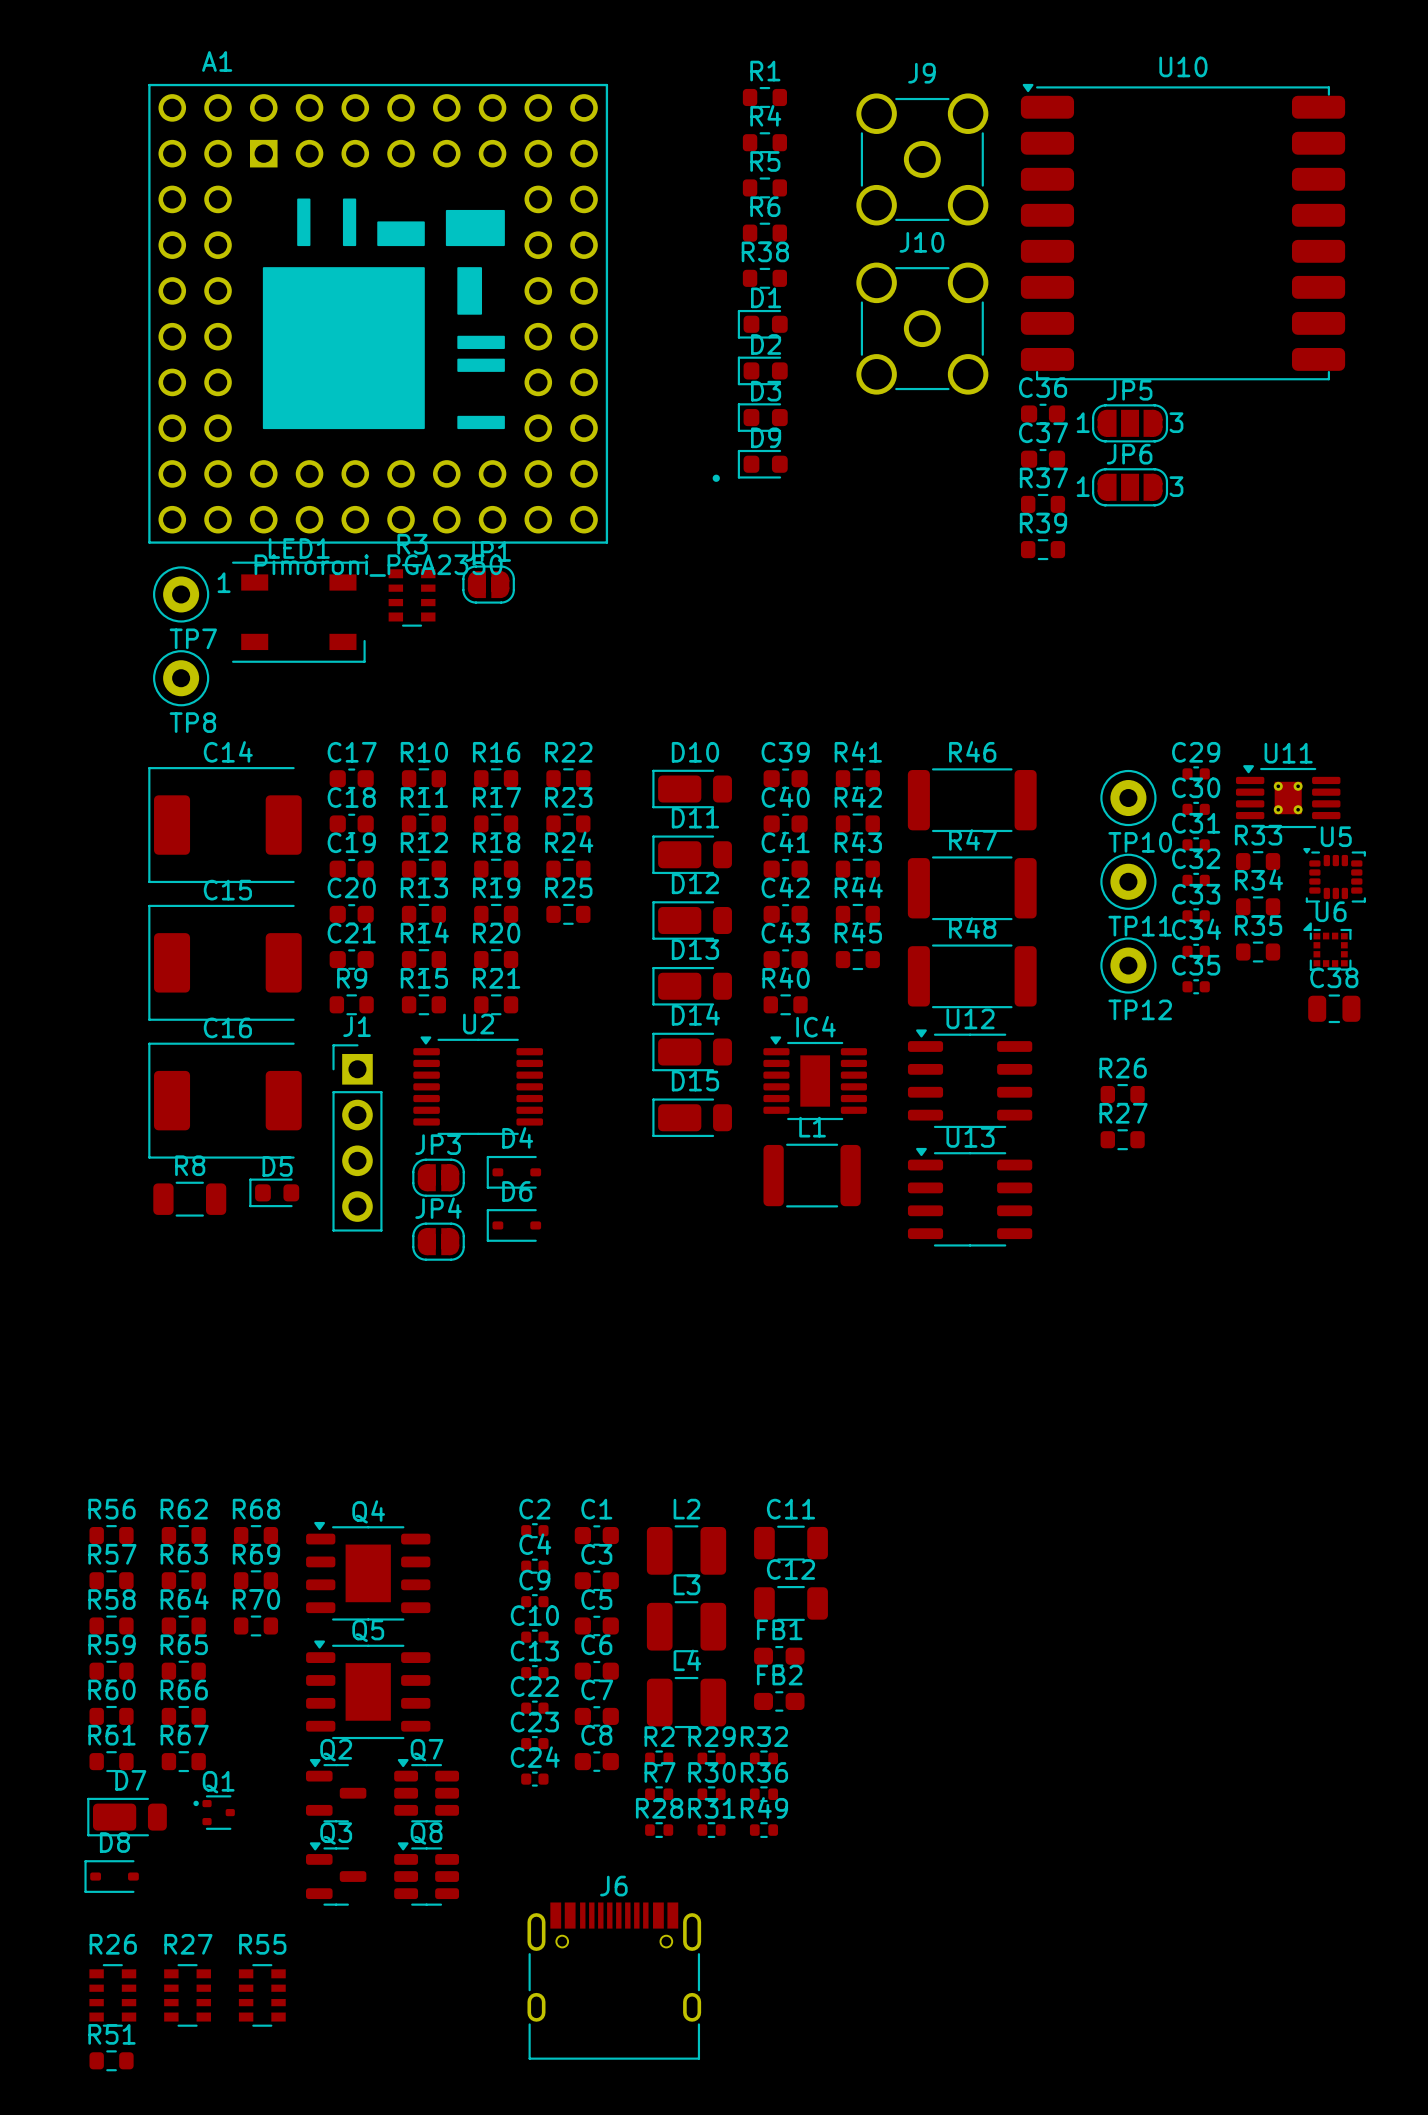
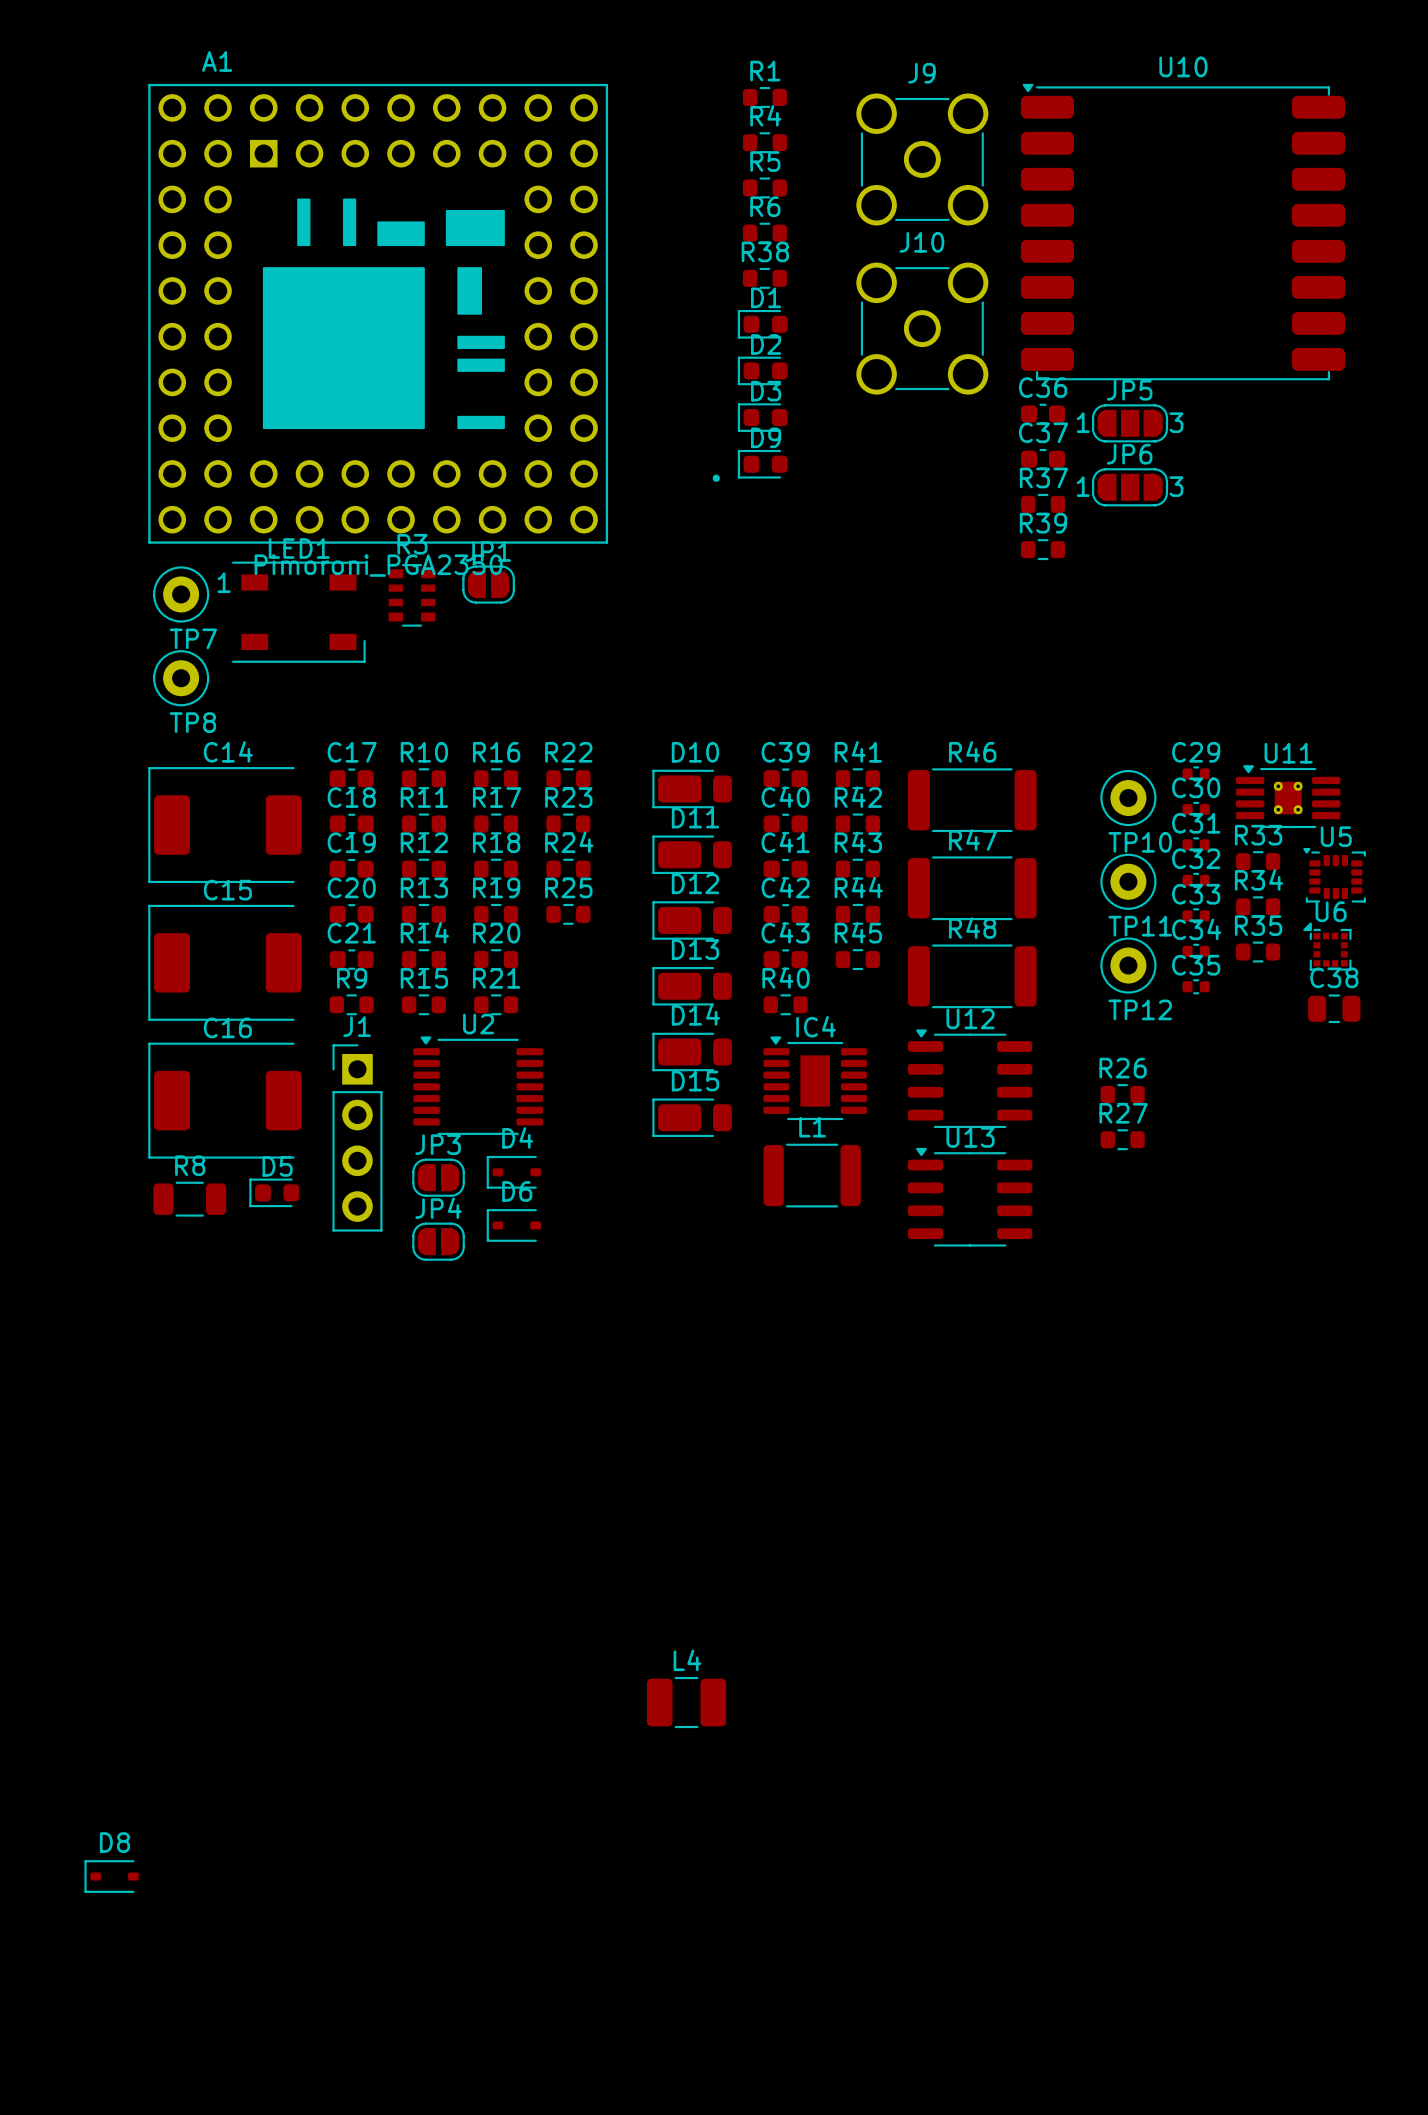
C2: (534, 1530) -> none
R56: (111, 1535) -> none
R62: (183, 1535) -> none
R68: (256, 1535) -> none
C1: (596, 1535) -> none
C11: (791, 1543) -> none
L2: (686, 1550) -> none
C4: (534, 1566) -> none
Q4: (368, 1571) -> none
R57: (111, 1580) -> none
R63: (183, 1580) -> none
R69: (256, 1580) -> none
C3: (596, 1580) -> none
C9: (534, 1601) -> none
C12: (791, 1603) -> none
R58: (111, 1625) -> none
R64: (183, 1625) -> none
R70: (256, 1625) -> none
C5: (596, 1625) -> none
L3: (686, 1626) -> none
C10: (534, 1637) -> none
FB1: (779, 1656) -> none
R59: (111, 1671) -> none
R65: (183, 1671) -> none
C6: (596, 1671) -> none
C13: (534, 1672) -> none
Q5: (368, 1689) -> none
FB2: (779, 1701) -> none
C22: (534, 1708) -> none
R60: (111, 1716) -> none
R66: (183, 1716) -> none
C7: (596, 1716) -> none
C23: (534, 1743) -> none
R2: (659, 1758) -> none
R29: (711, 1758) -> none
R32: (763, 1758) -> none
R61: (111, 1761) -> none
R67: (183, 1761) -> none
C8: (596, 1761) -> none
C24: (534, 1779) -> none
Q2: (336, 1790) -> none
Q7: (426, 1790) -> none
R7: (659, 1794) -> none
R30: (711, 1794) -> none
R36: (763, 1794) -> none
Q1: (214, 1812) -> none
D7: (127, 1817) -> none
R28: (659, 1830) -> none
R31: (711, 1830) -> none
R49: (763, 1830) -> none
Q3: (336, 1874) -> none
Q8: (426, 1874) -> none
J6: (614, 1981) -> none
R26: (112, 1995) -> none
R27: (187, 1995) -> none
R55: (262, 1995) -> none
R51: (111, 2060) -> none

